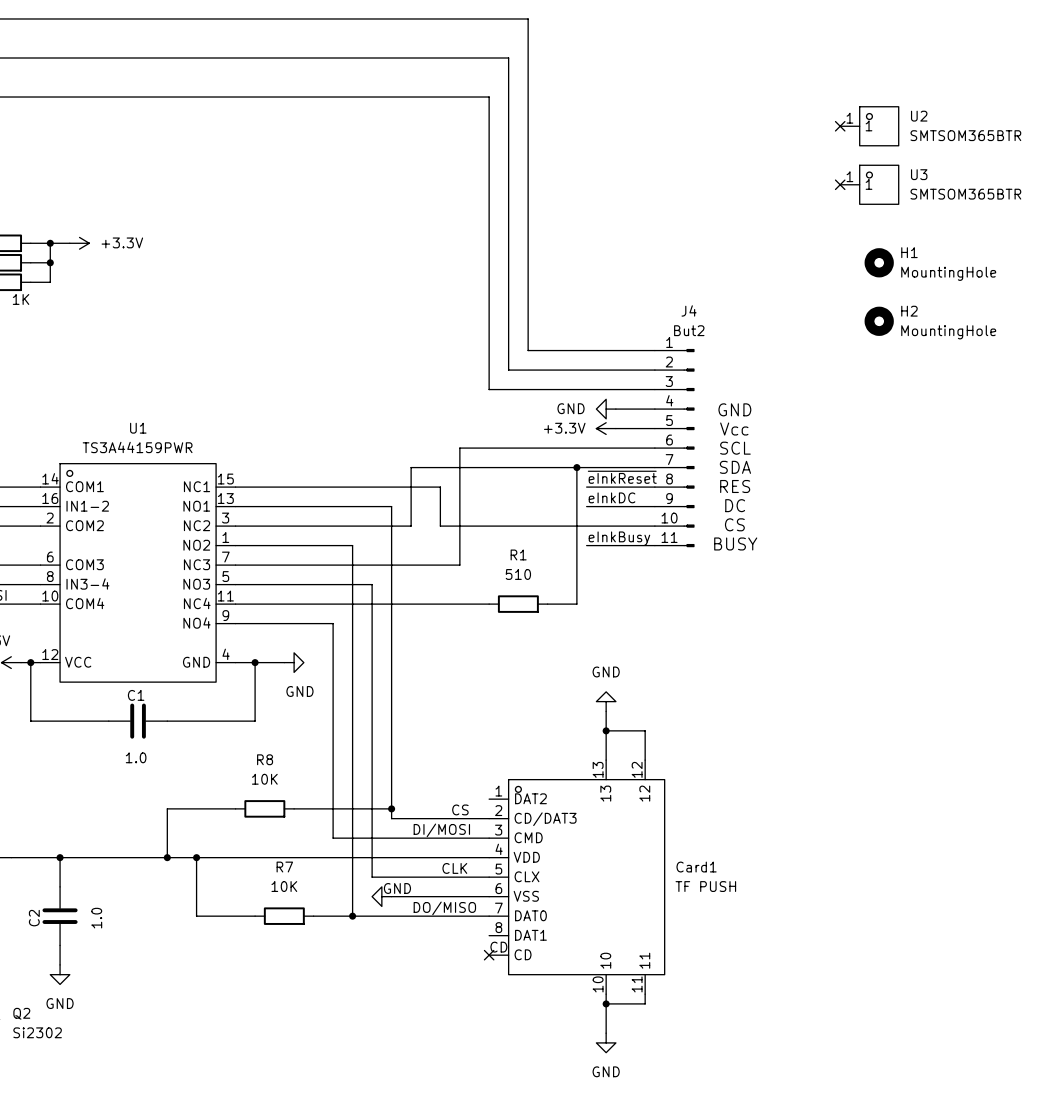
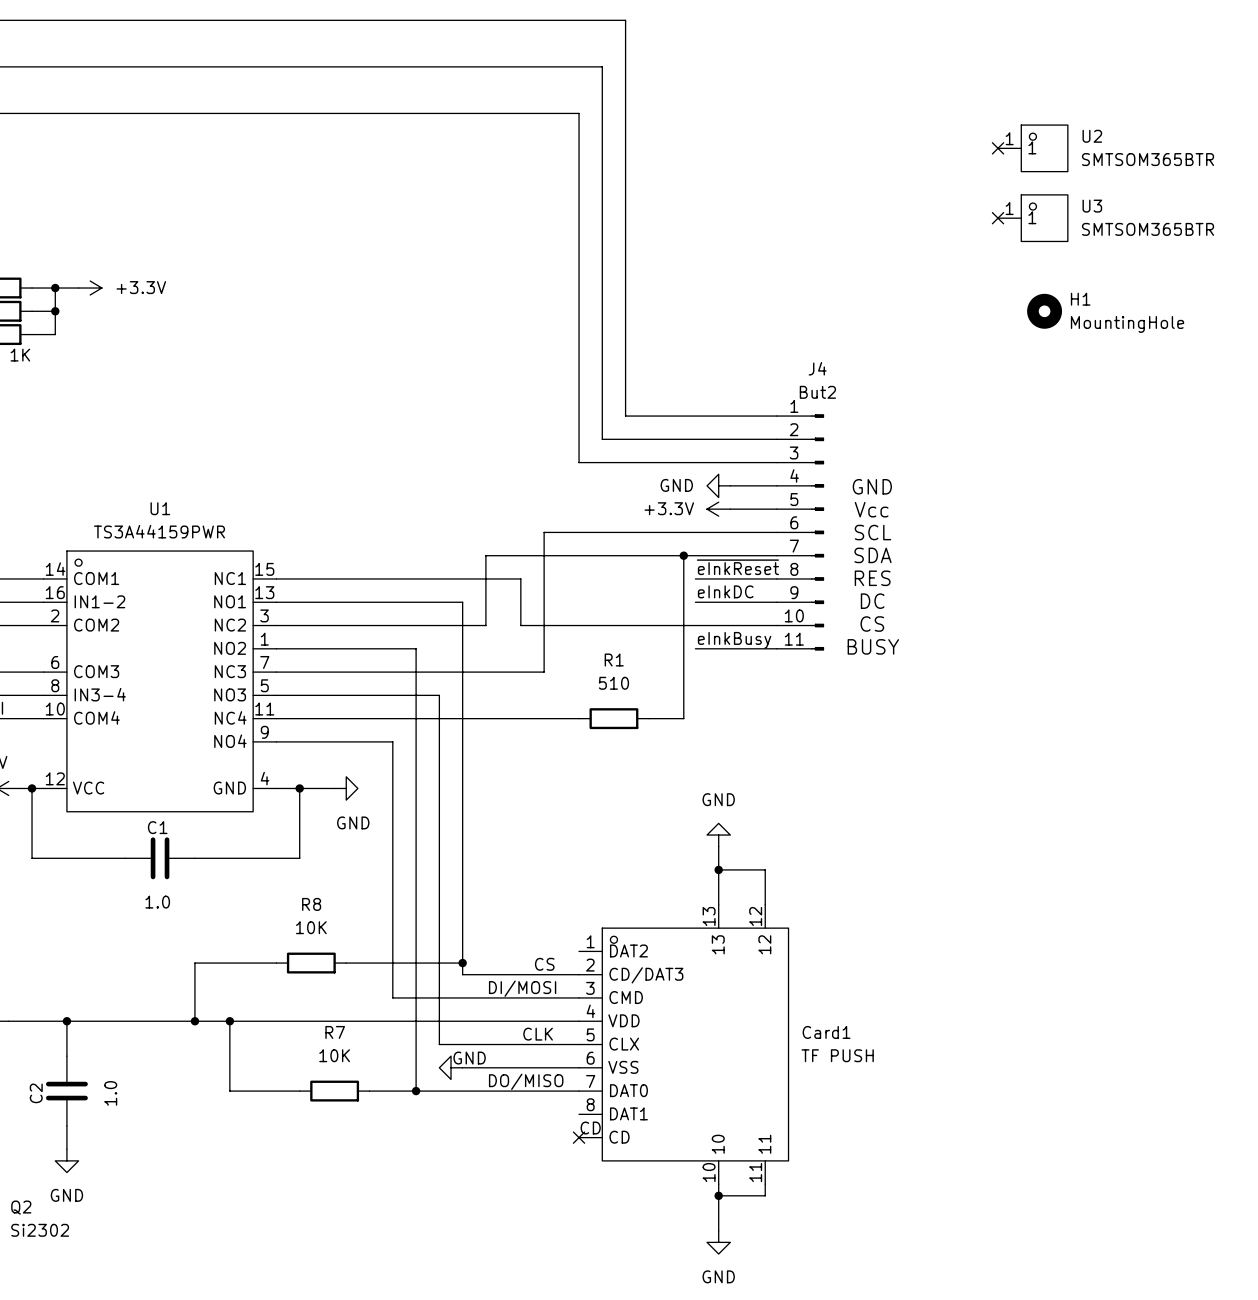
H2: MountingHole (879, 321) -> none

